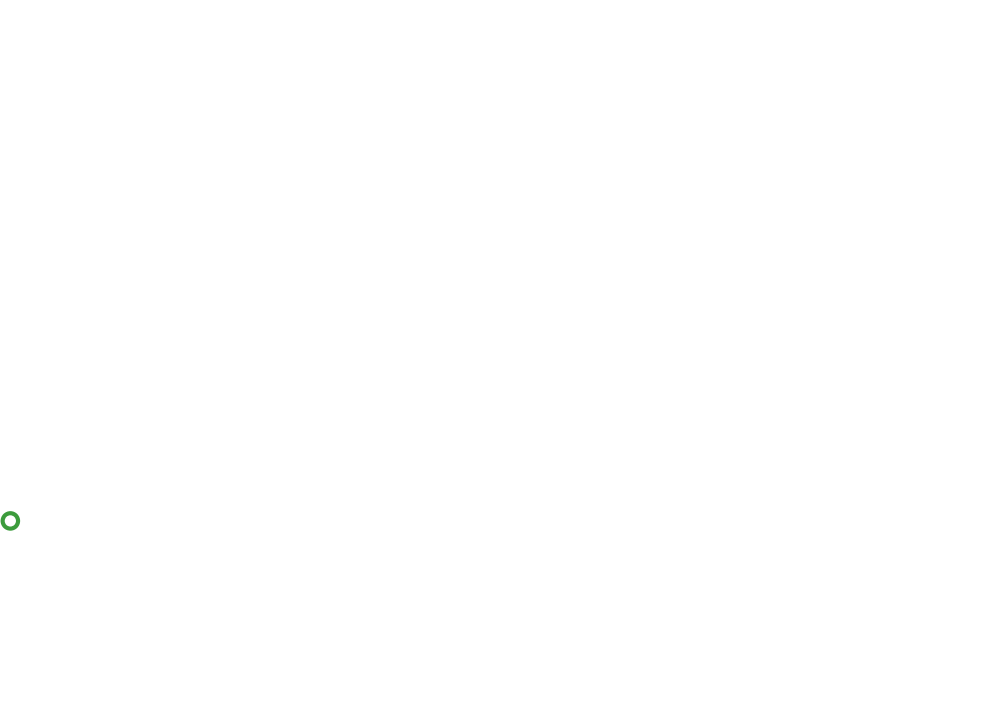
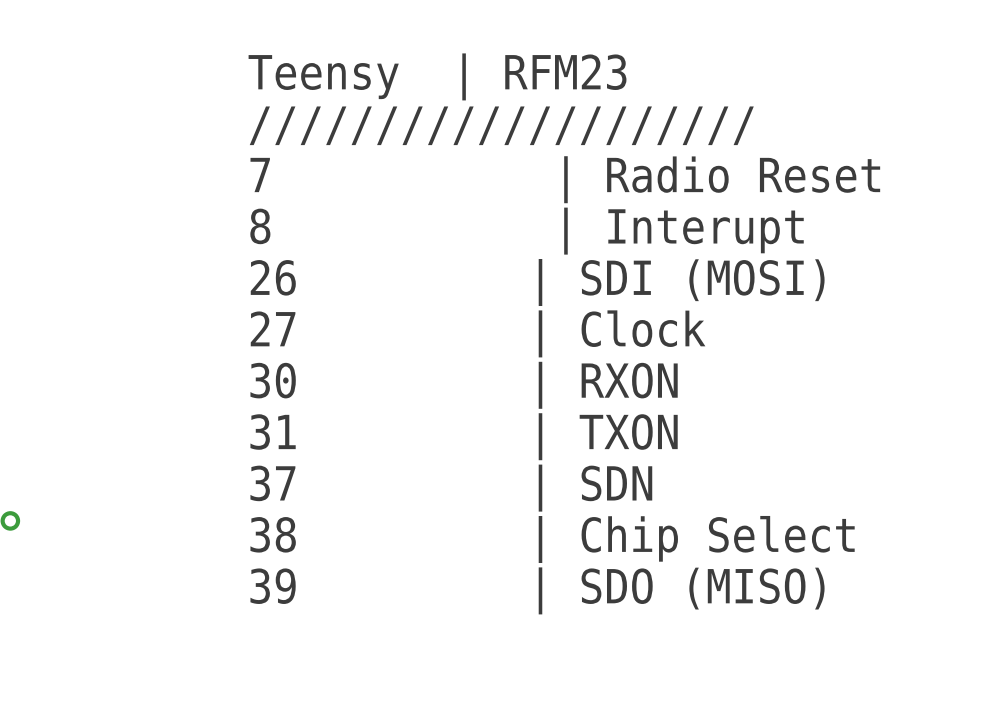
text: none -> Teensy | RFM23 (437, 76)
text: none -> //////////////////// (501, 125)
text: none -> 7 | Radio Reset (565, 179)
text: none -> 8 | Interupt (527, 231)
text: none -> 26 | SDI (MOSI) (537, 282)
text: none -> 27 | Clock (478, 333)
text: none -> 30 | RXON (464, 385)
text: none -> 31 | TXON (464, 436)
text: none -> 37 | SDN (451, 488)
text: none -> 38 | Chip Select (552, 539)
text: none -> 39 | SDO (MISO) (537, 590)

